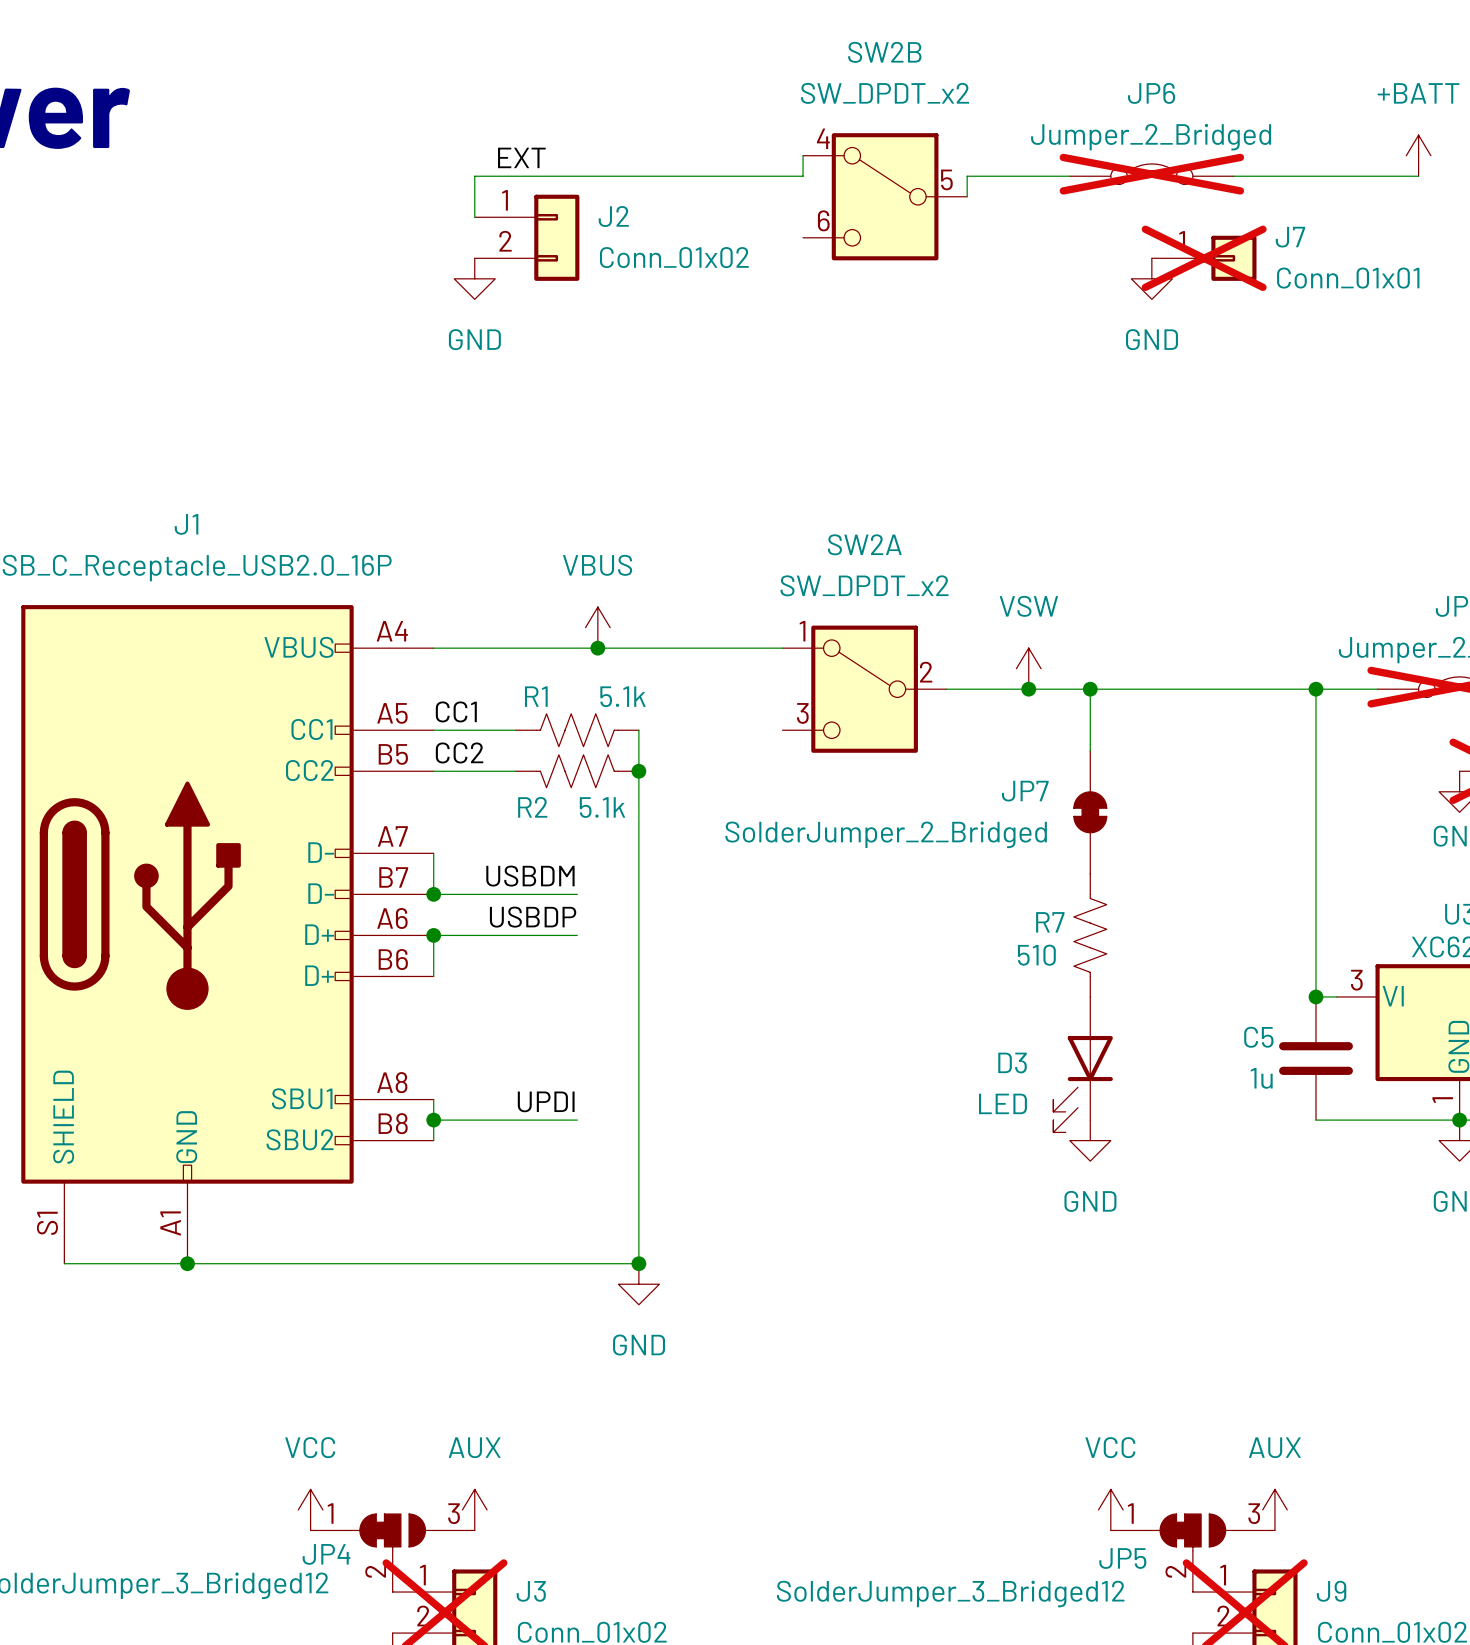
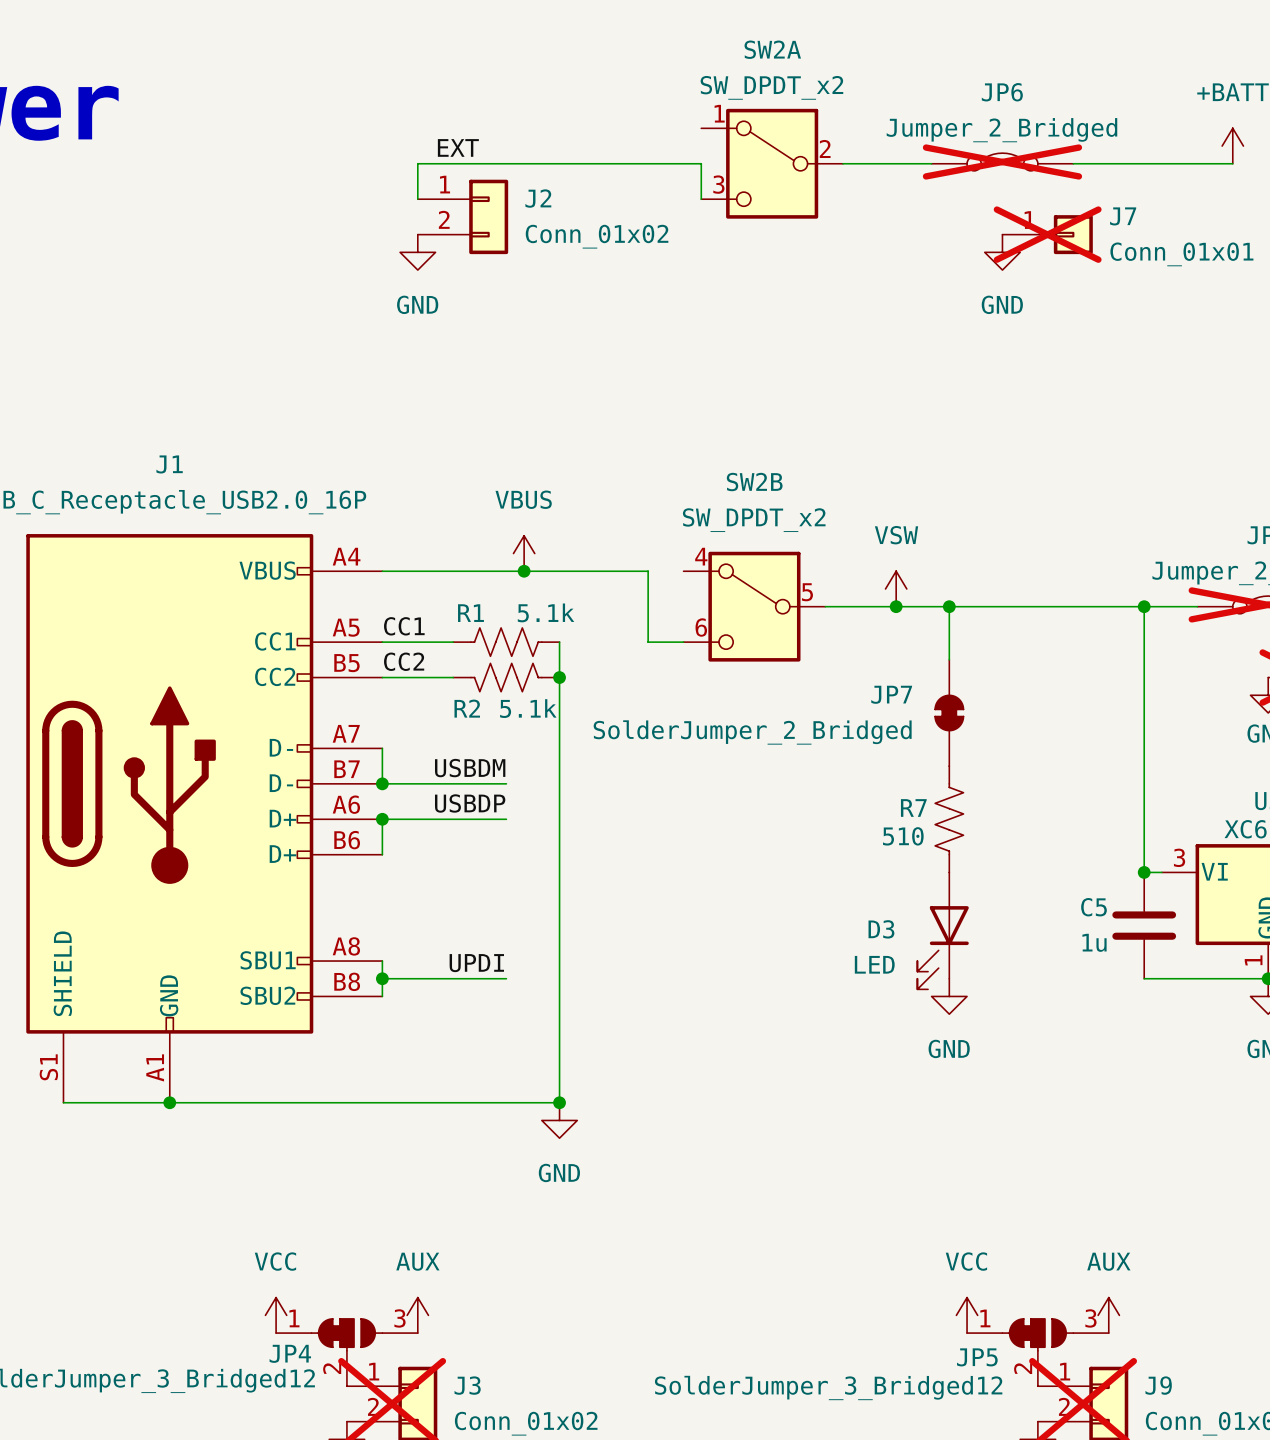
wire: (803, 155) (803, 176) -> (701, 199) (701, 163)
wire: (967, 176) (967, 196) -> none
SW2B position: (885, 196) -> (754, 606)
SW2A name position: SW2A (864, 544) -> SW2A (772, 49)
SW2A value position: SW_DPDT_x2 (864, 585) -> SW_DPDT_x2 (771, 87)
wire: (741, 648) (782, 648) -> (648, 571) (648, 642) (683, 642)
SW2A position: (864, 689) -> (772, 163)

